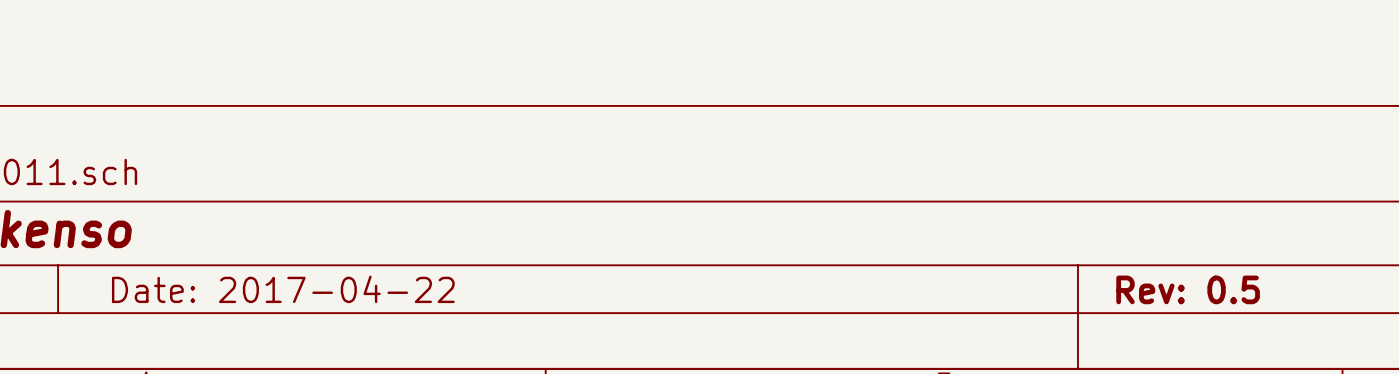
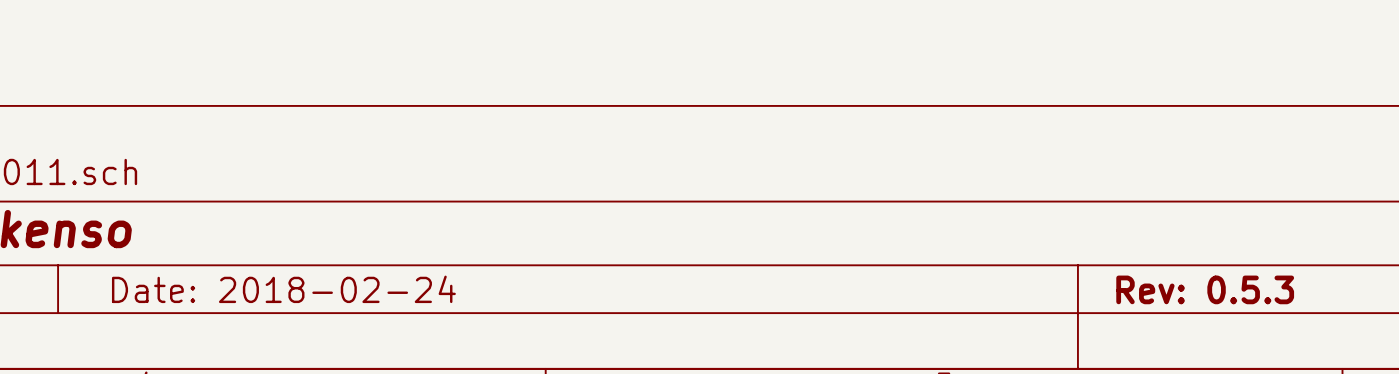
title block: Date: 2017-04-22 (283, 289) -> Date: 2018-02-24 (283, 289)
title block: Rev: 0.5 (1188, 289) -> Rev: 0.5.3 (1205, 289)

